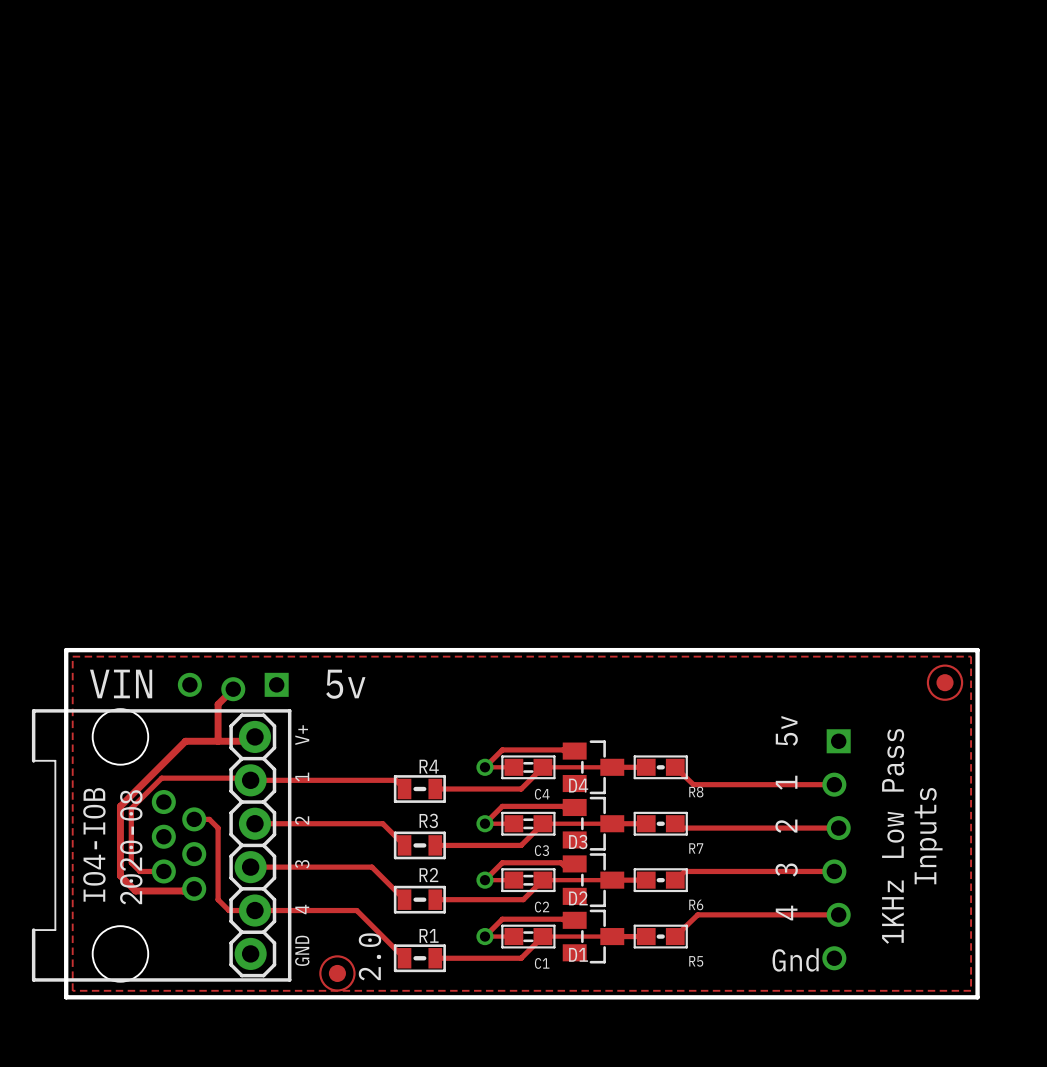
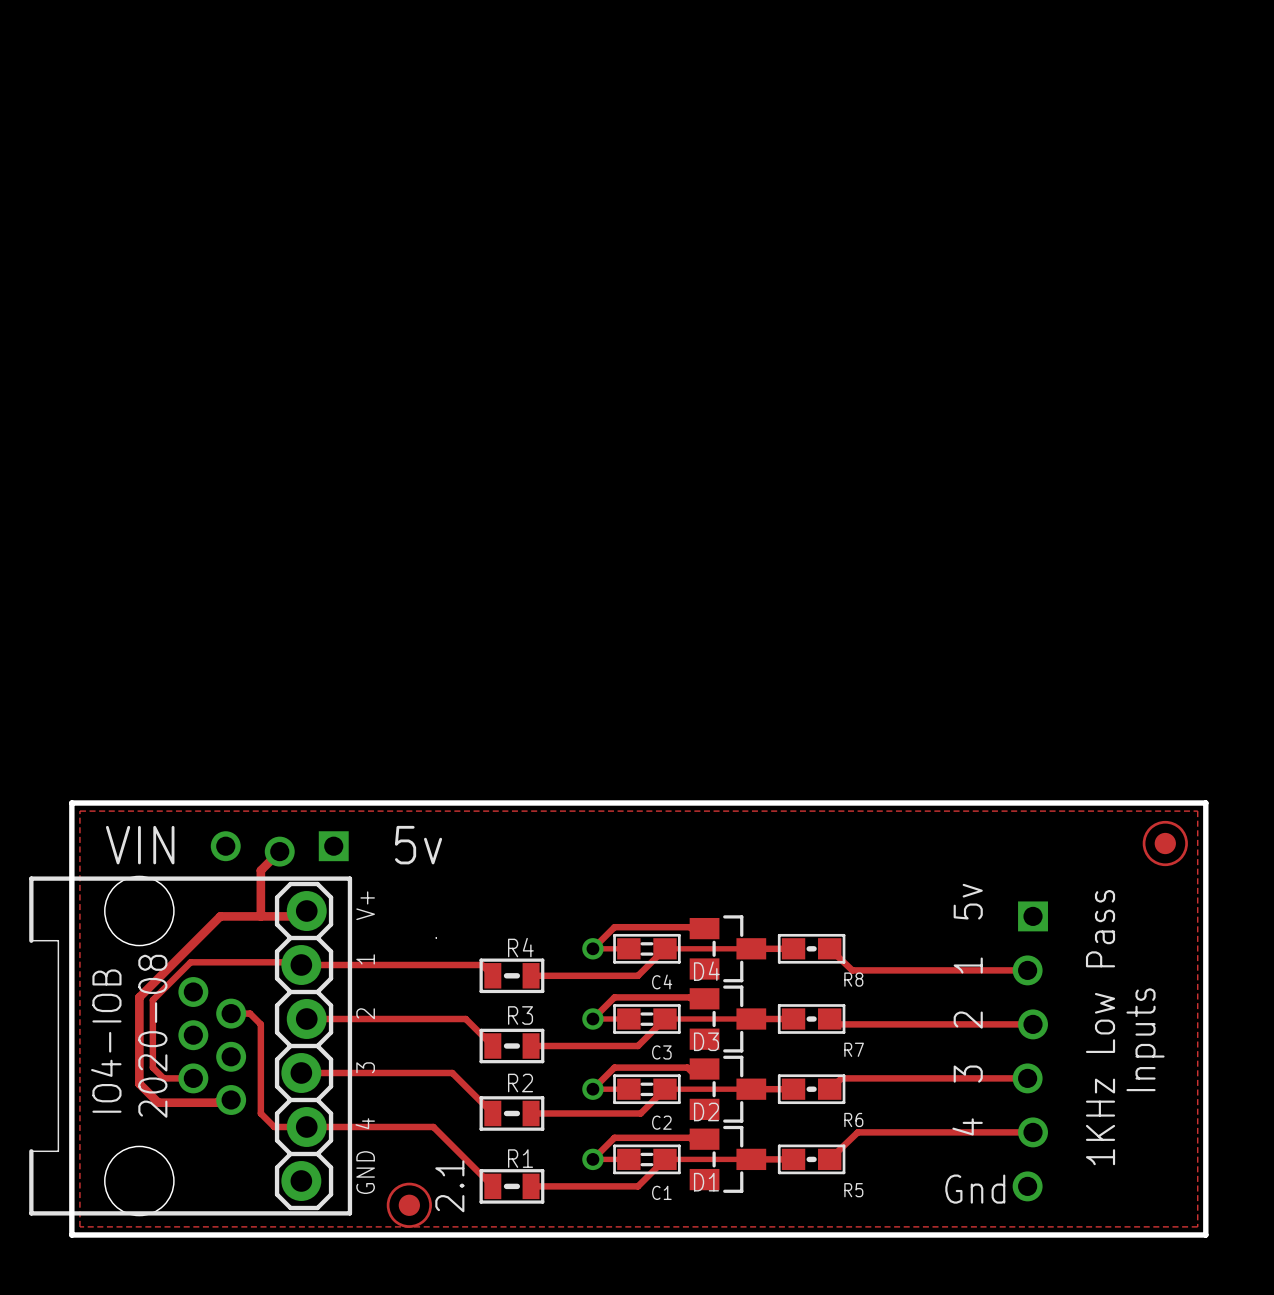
text: 2.0 (369, 956) -> 2.1 (449, 1186)

